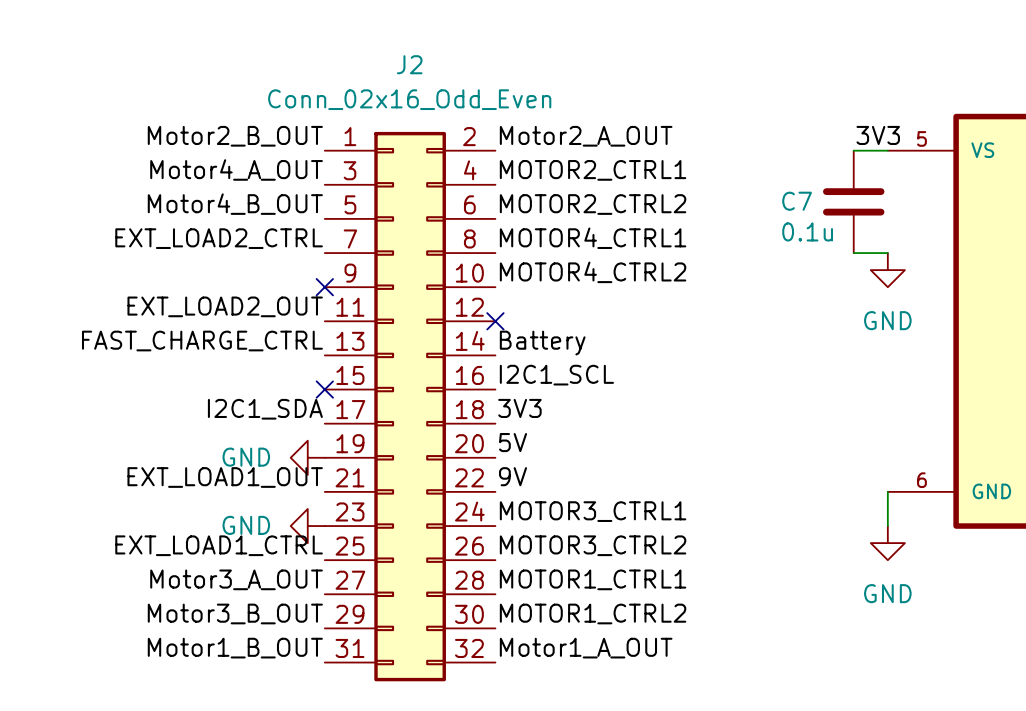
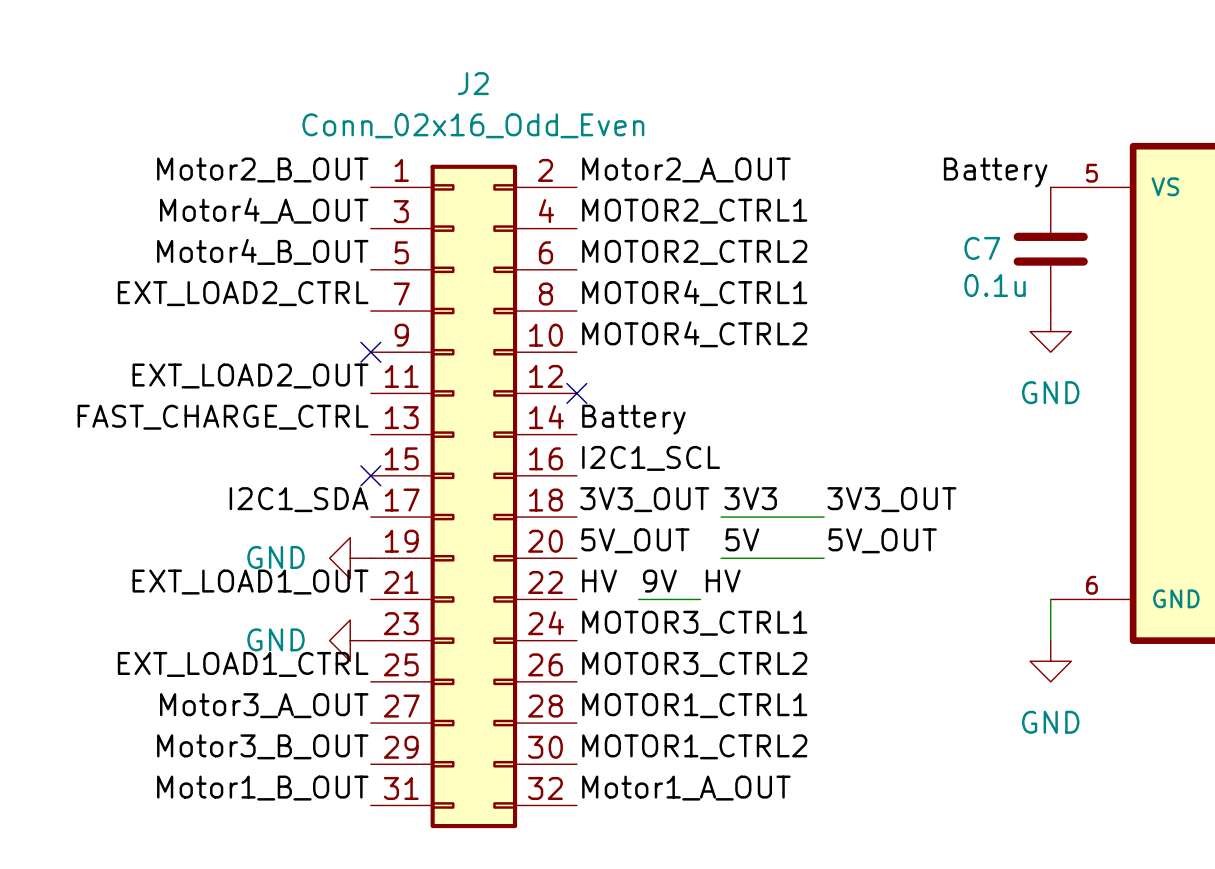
label: 3V3 (878, 135) -> none
label: none -> Battery (995, 172)
wire: (853, 150) (887, 150) -> none
C7 position: (853, 201) -> (1050, 249)
wire: (853, 253) (887, 253) -> none
label: 3V3 (519, 408) -> 3V3_OUT (644, 499)
label: none -> 3V3 (750, 498)
label: none -> 3V3_OUT (891, 499)
wire: none -> (721, 517) (824, 517)
label: 5V (513, 442) -> 5V_OUT (635, 540)
label: none -> 5V (742, 539)
label: none -> 5V_OUT (882, 540)
wire: none -> (721, 558) (824, 558)
label: 9V (513, 476) -> HV (599, 581)
label: none -> 9V (659, 581)
label: none -> HV (723, 581)
wire: none -> (638, 599) (700, 599)

